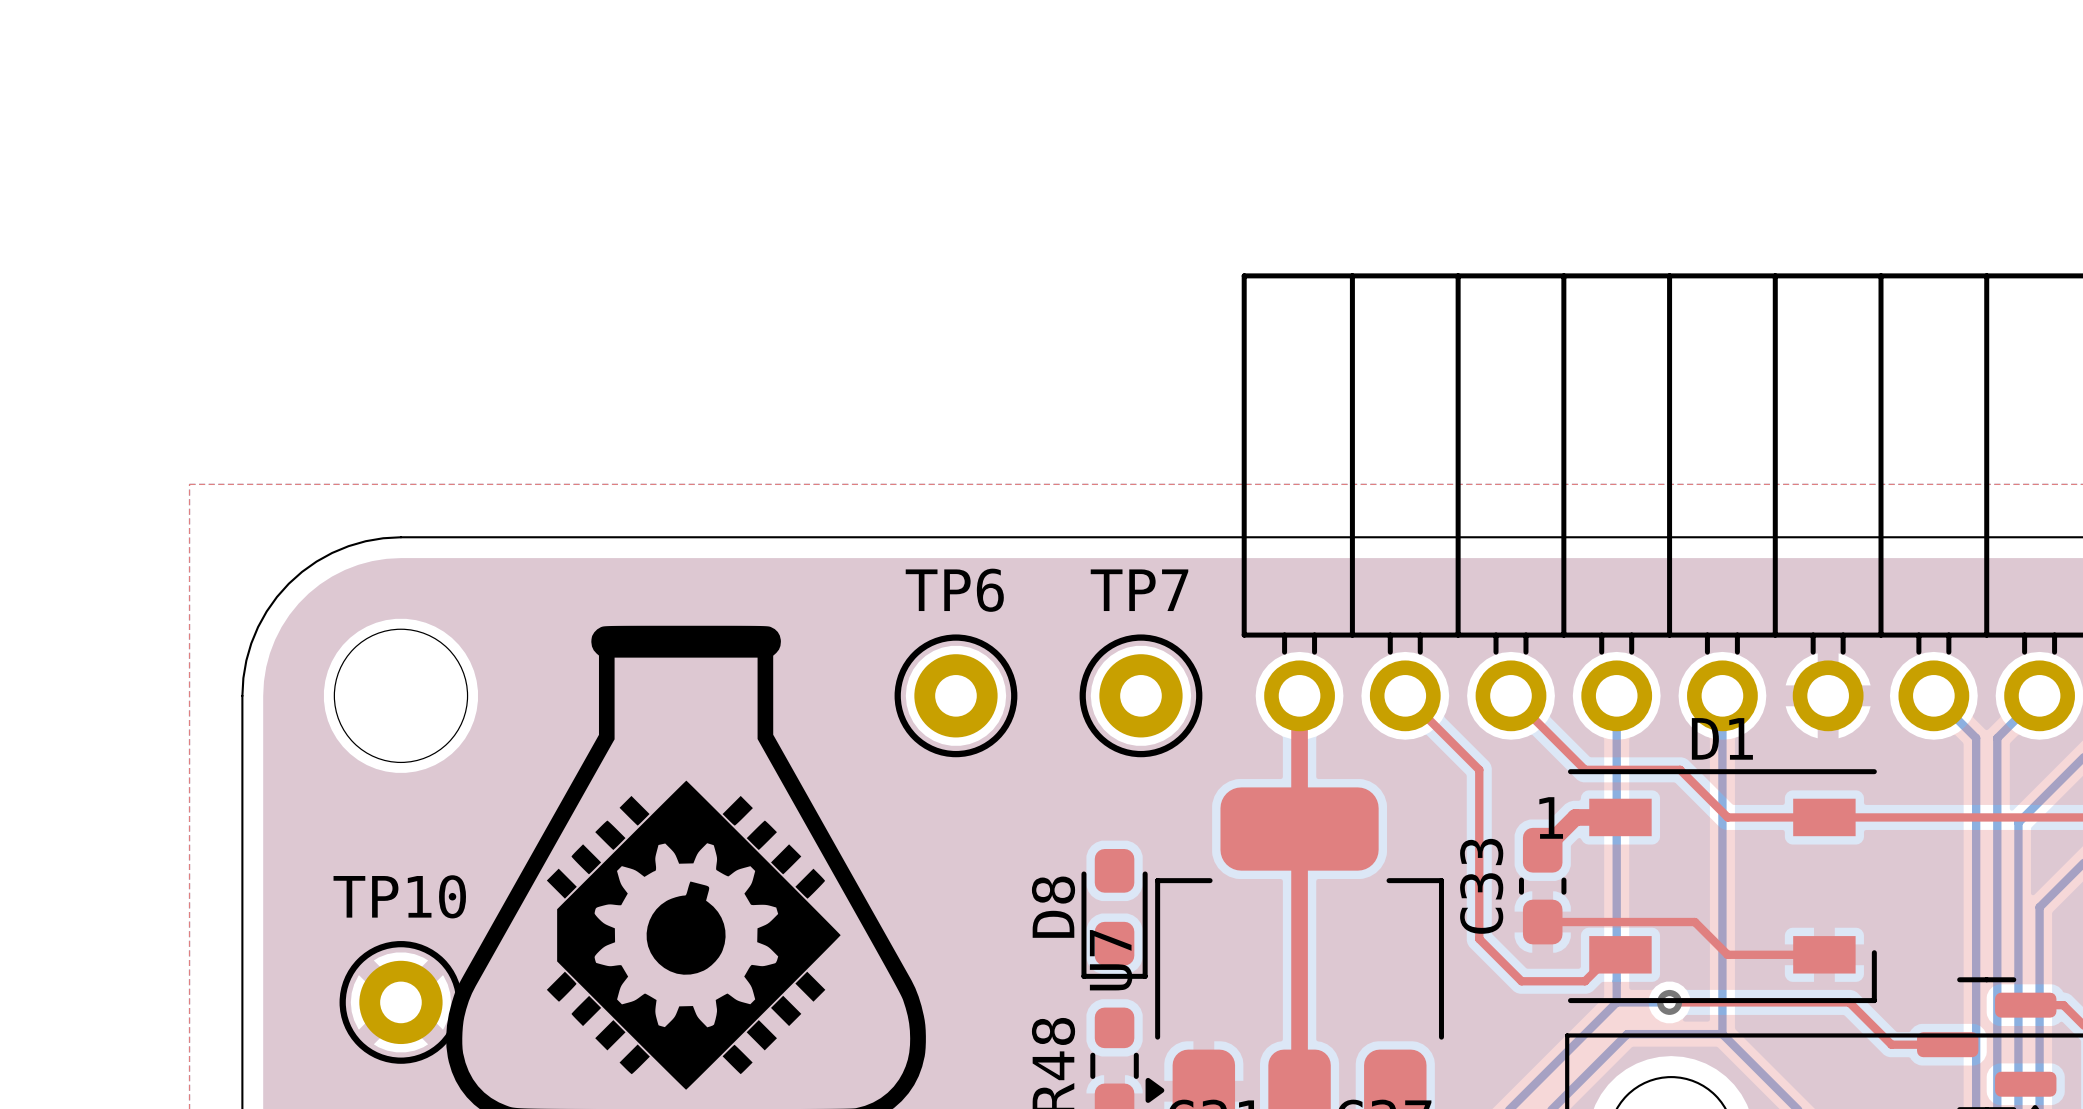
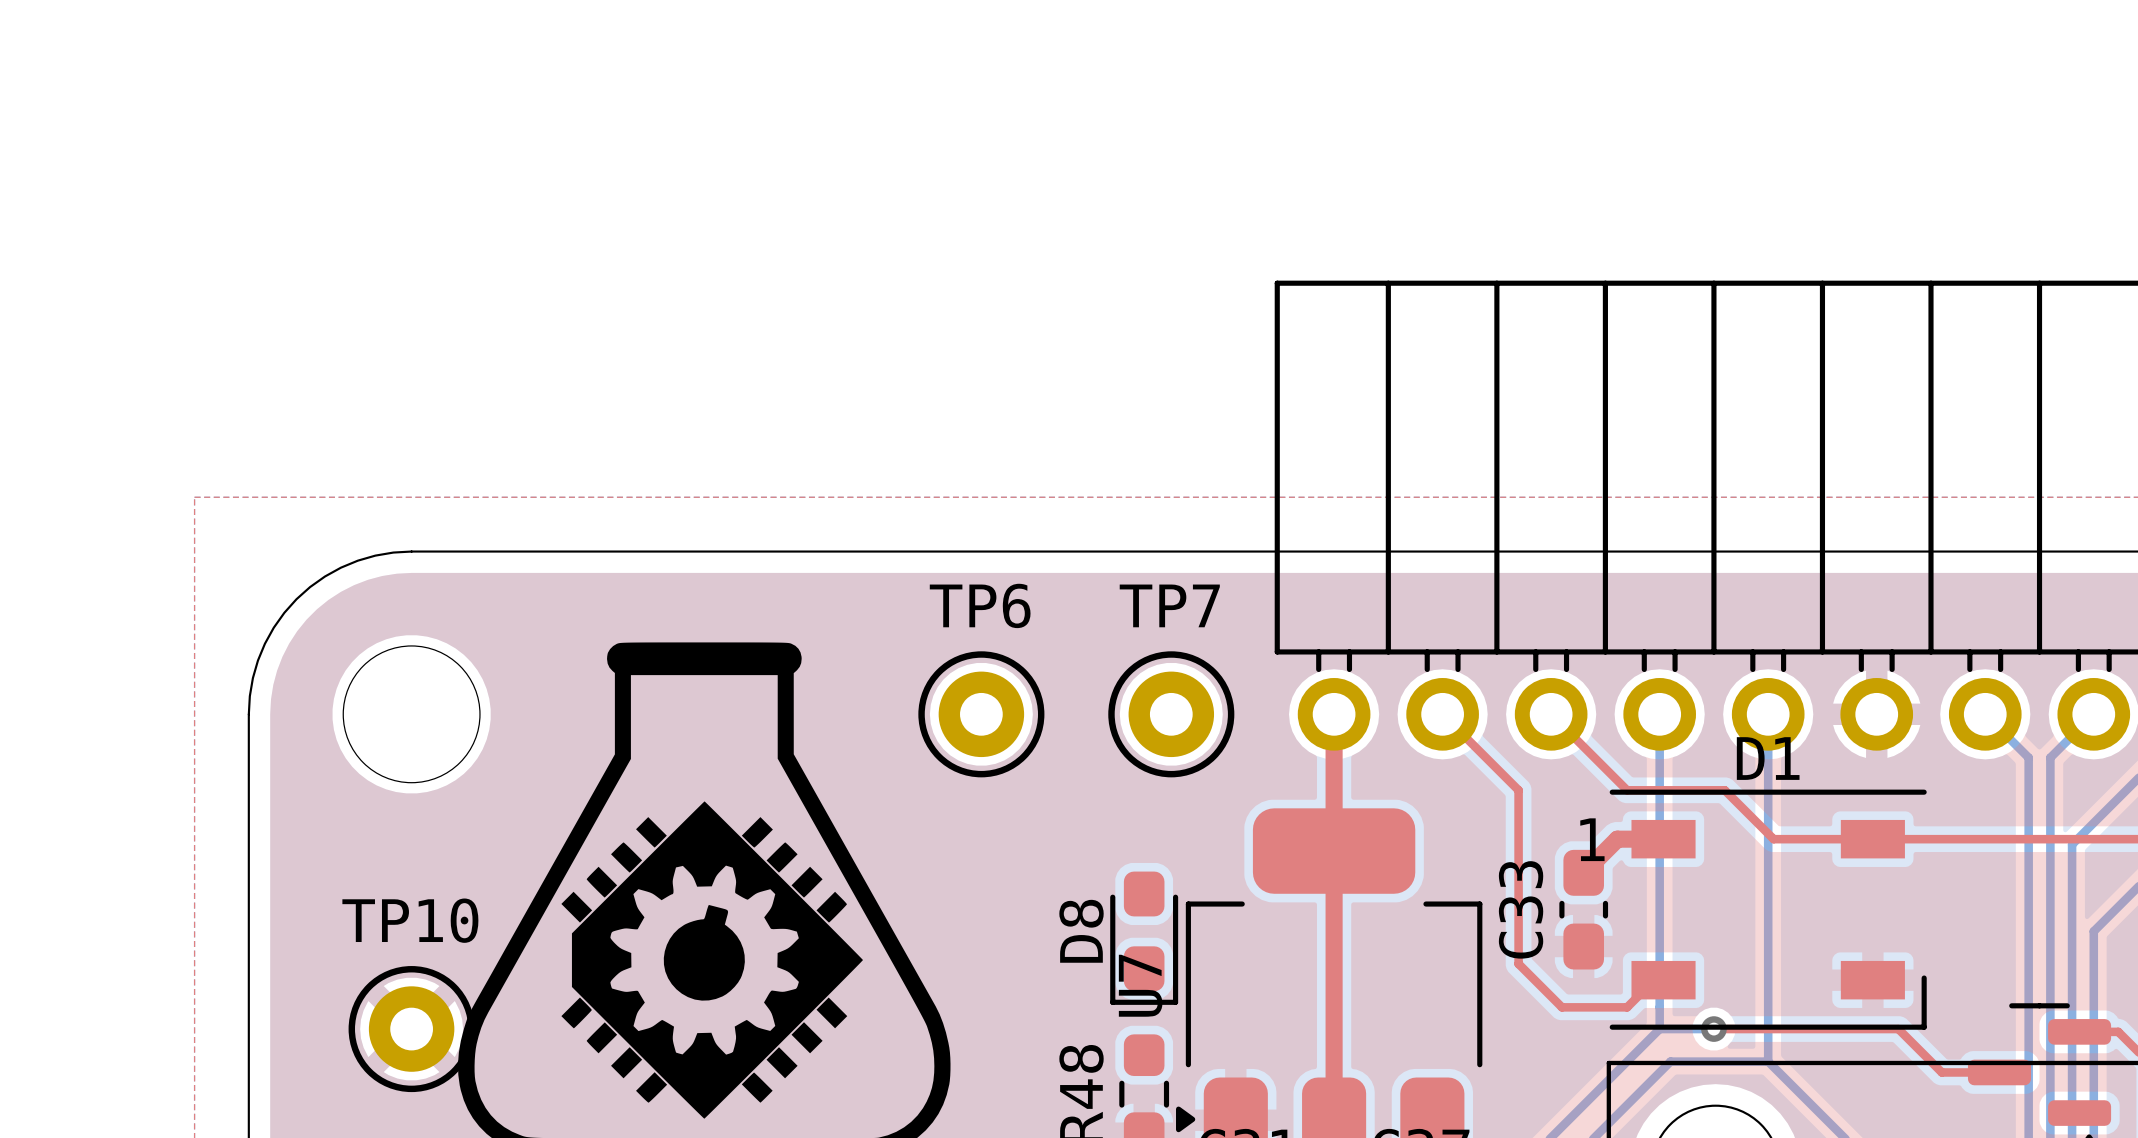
top track: (1542, 922) (1694, 922) (1727, 954) (1824, 954) -> none

